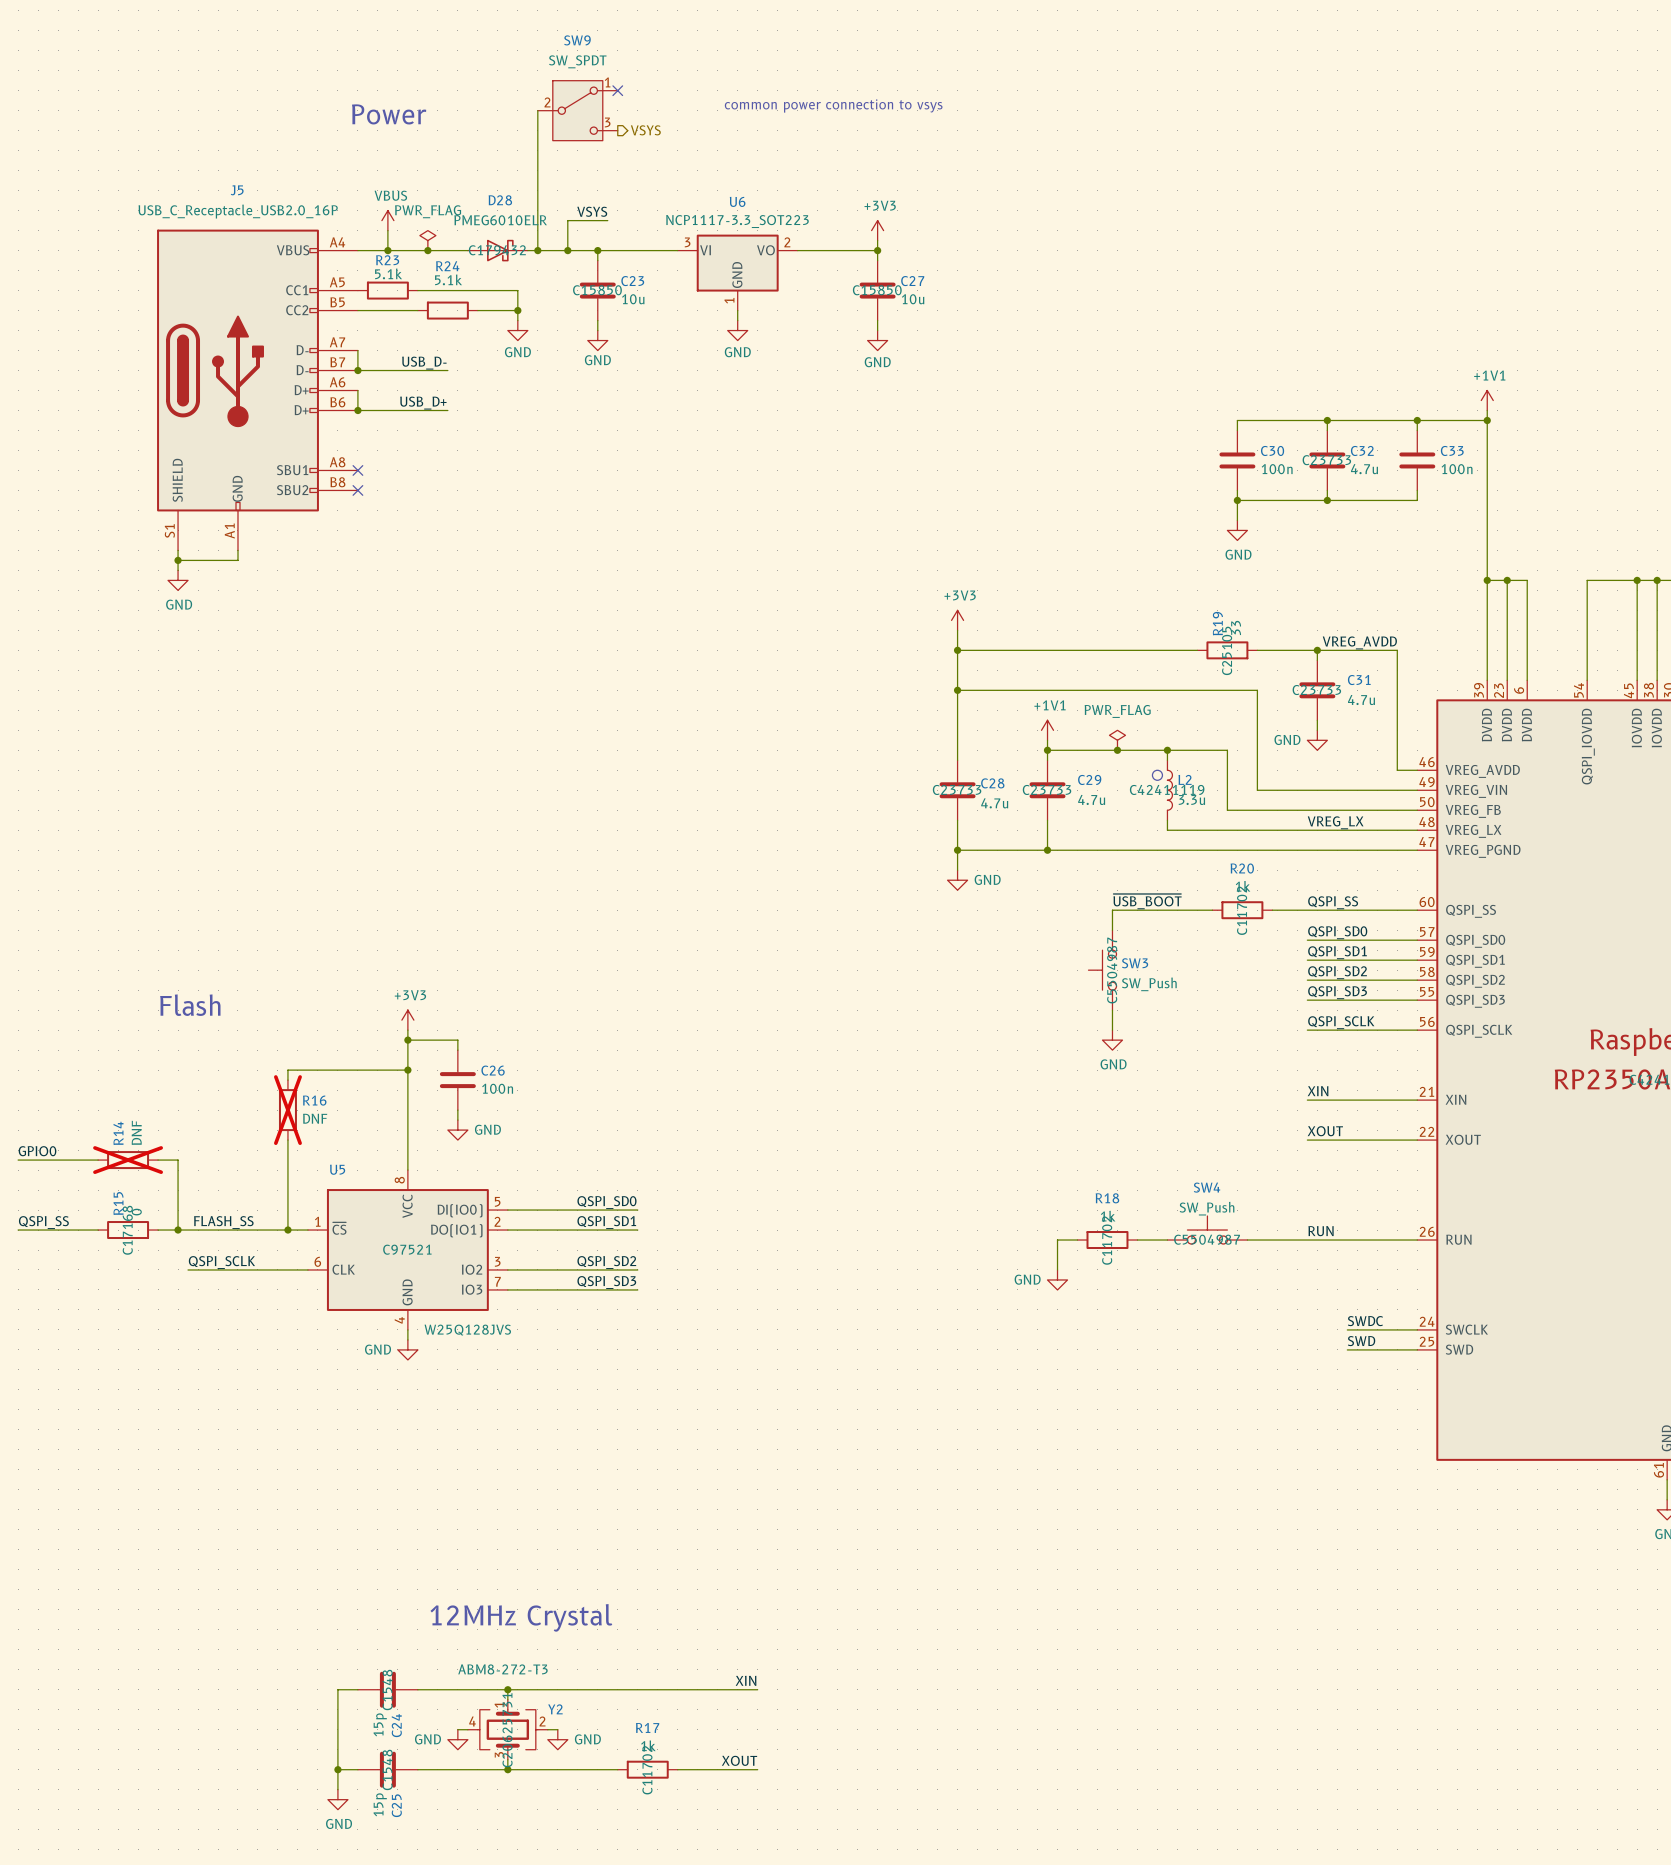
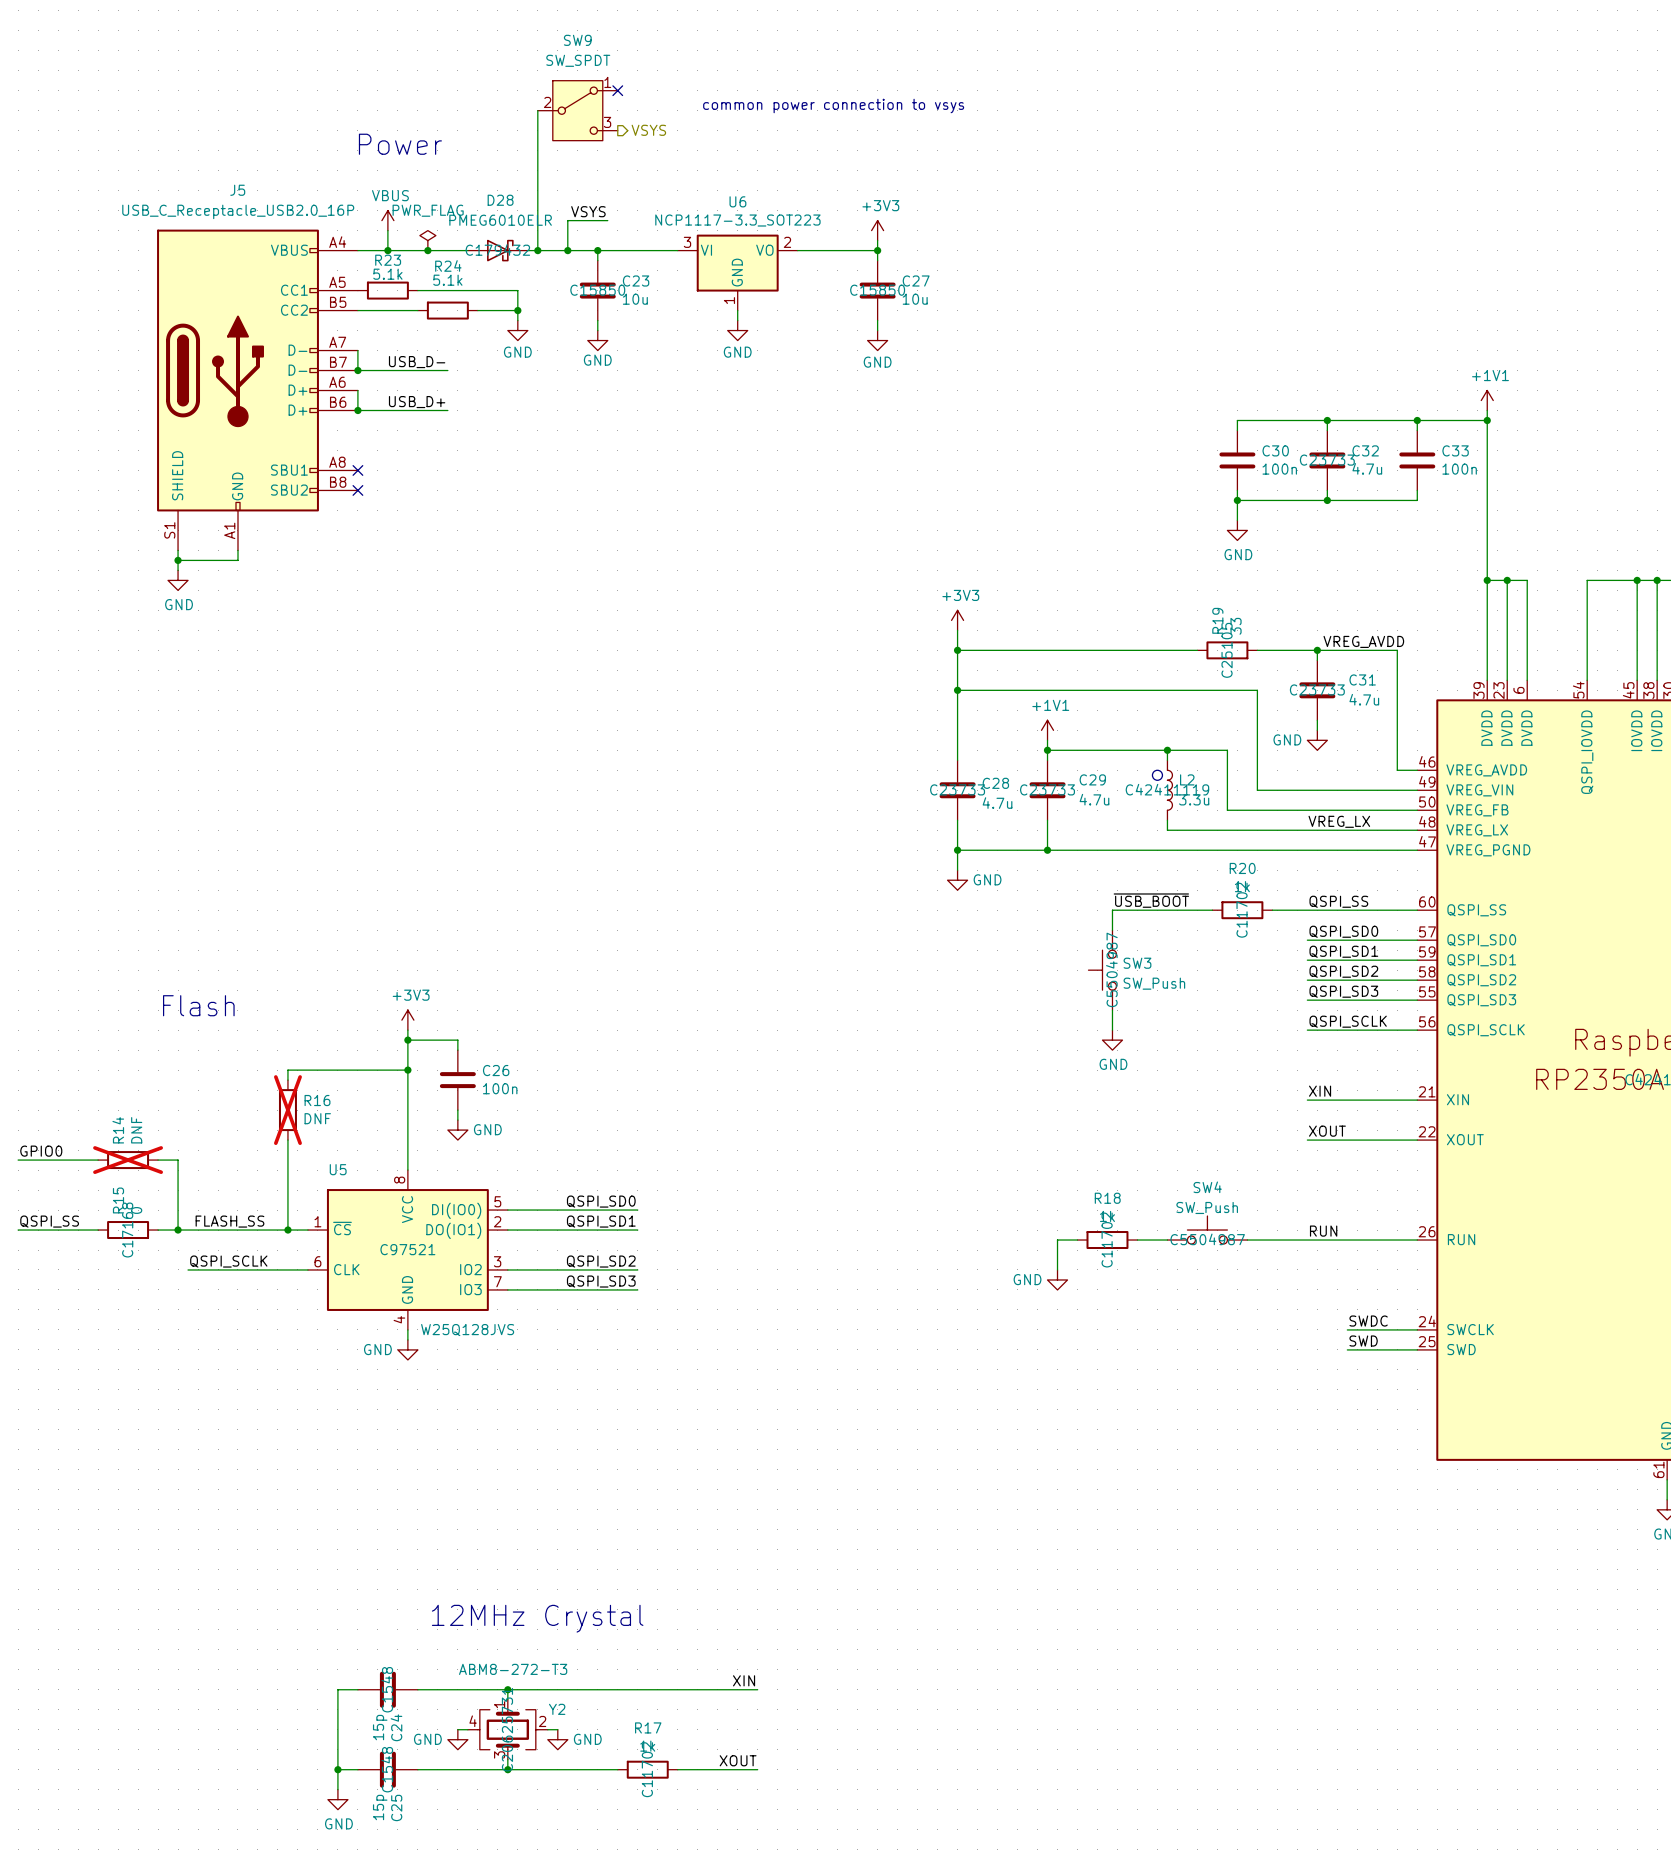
text position: Power (389, 114) -> Power (400, 144)
power symbol: PWR_FLAG (1117, 740) -> none
junction: (1117, 750) -> none

